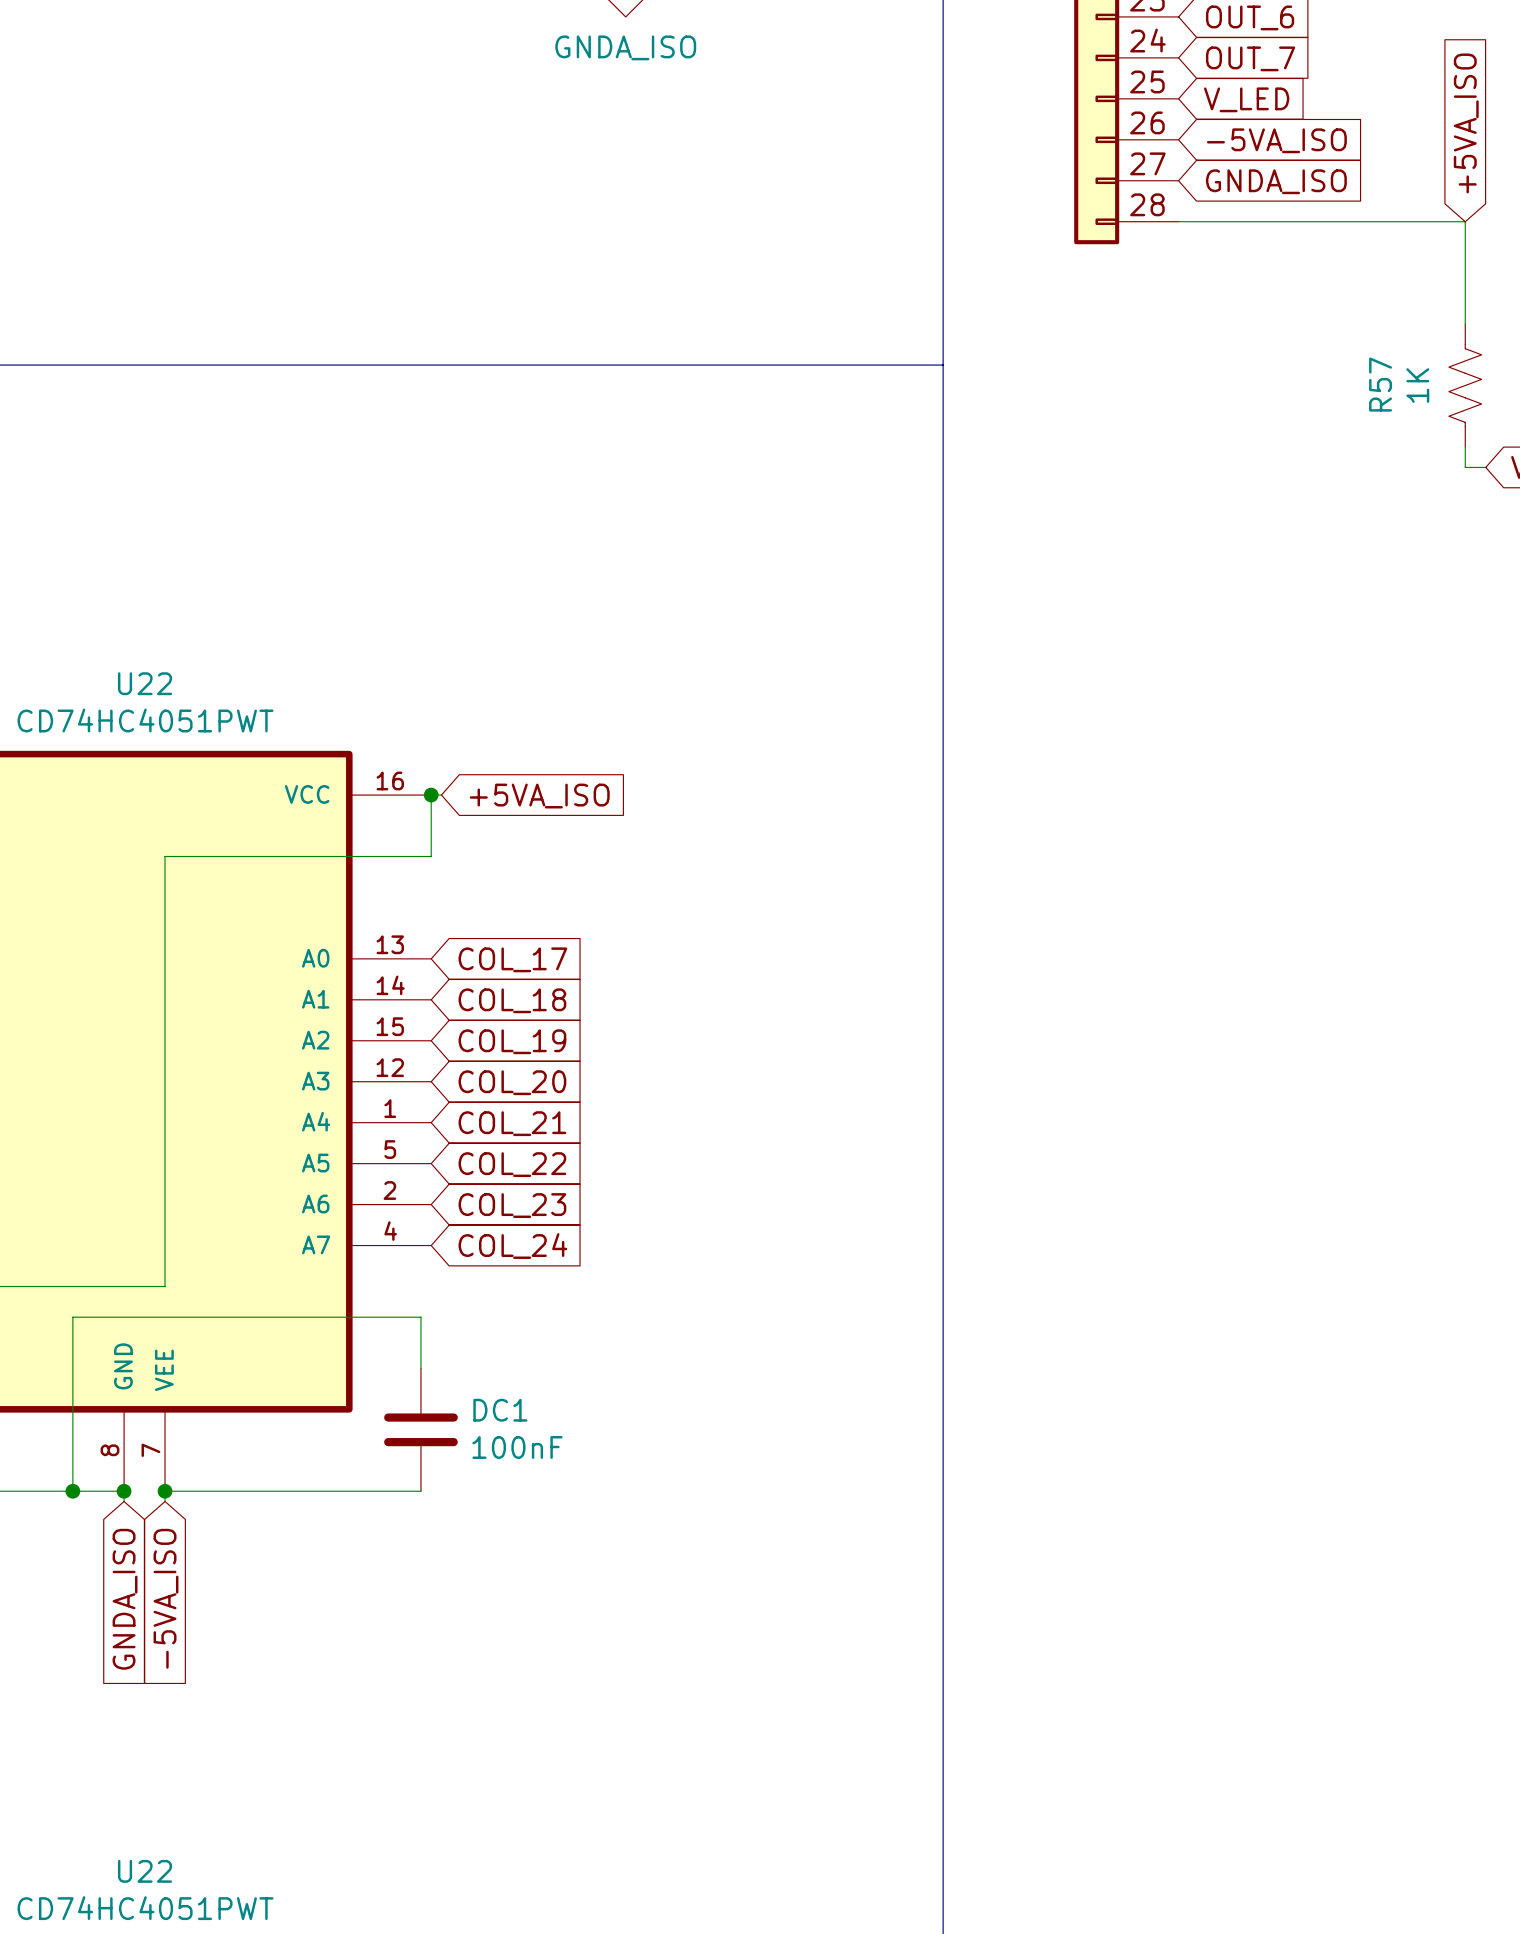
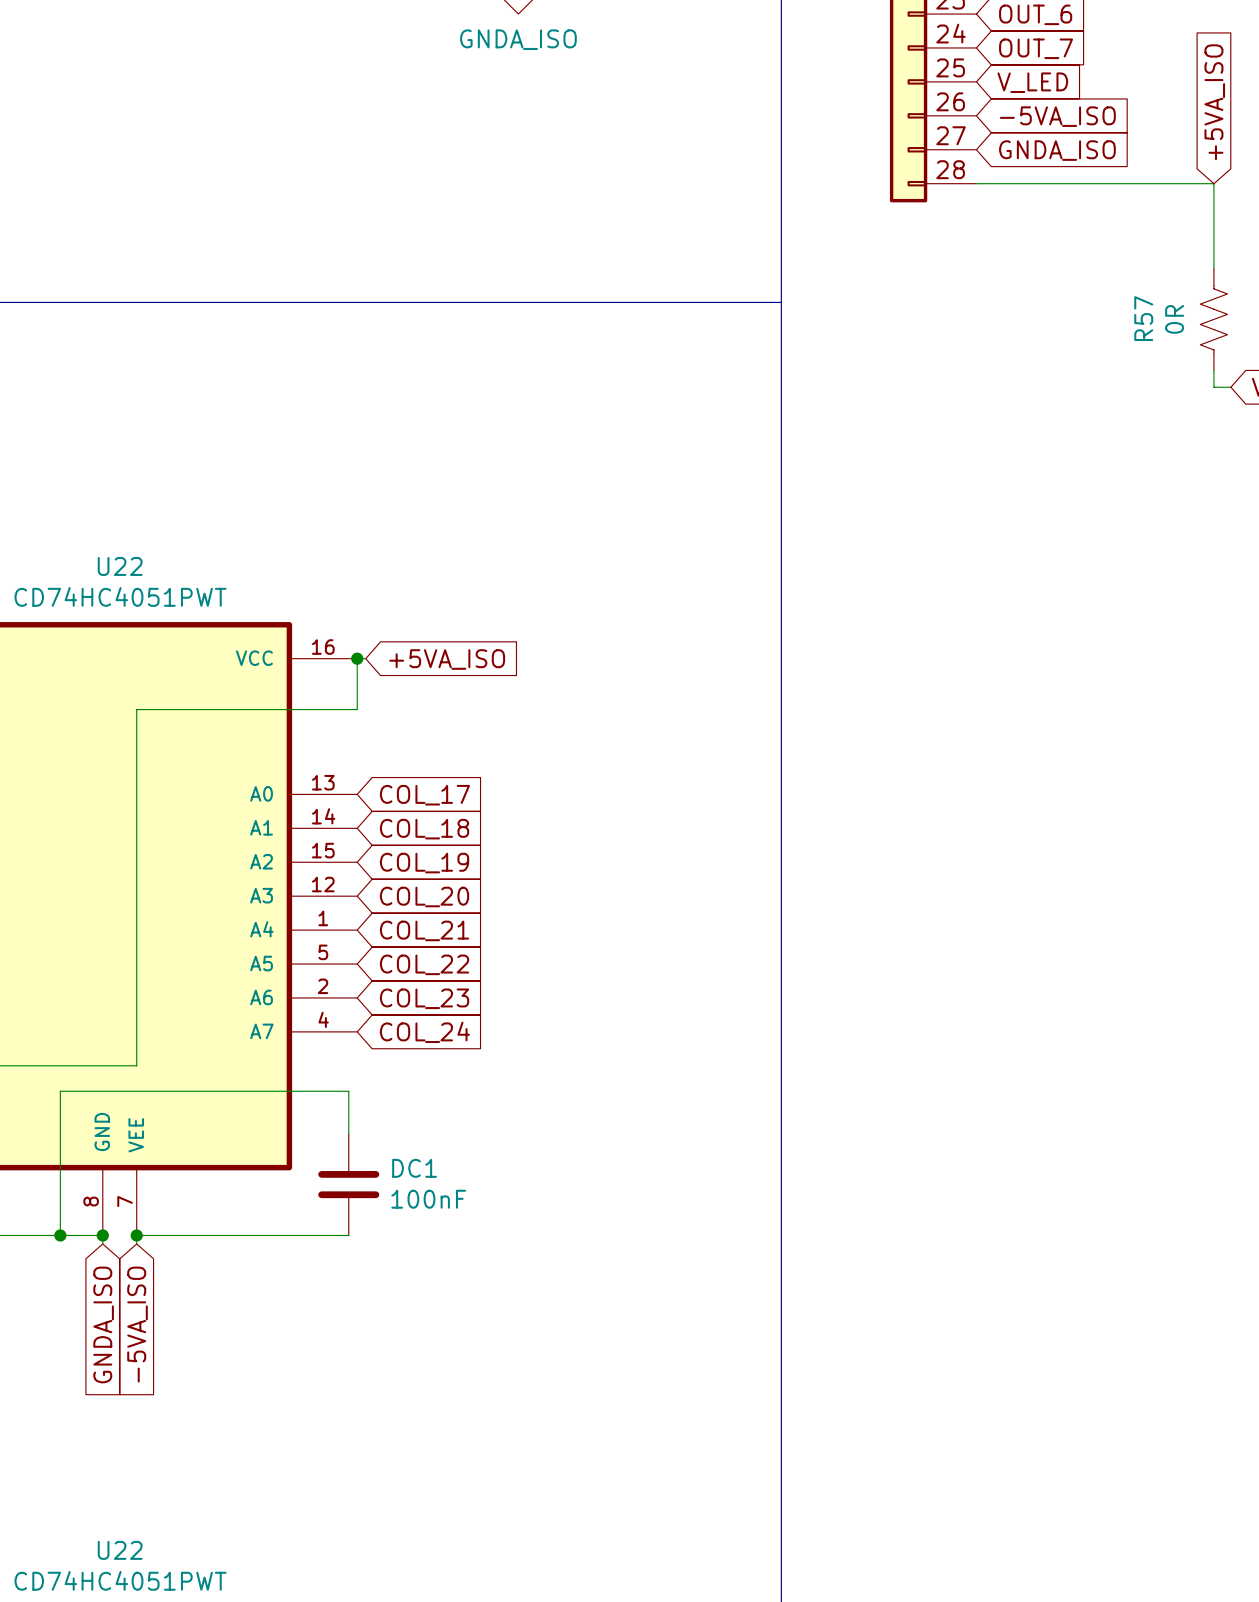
R57 value: 1K (1417, 385) -> 0R (1174, 319)

